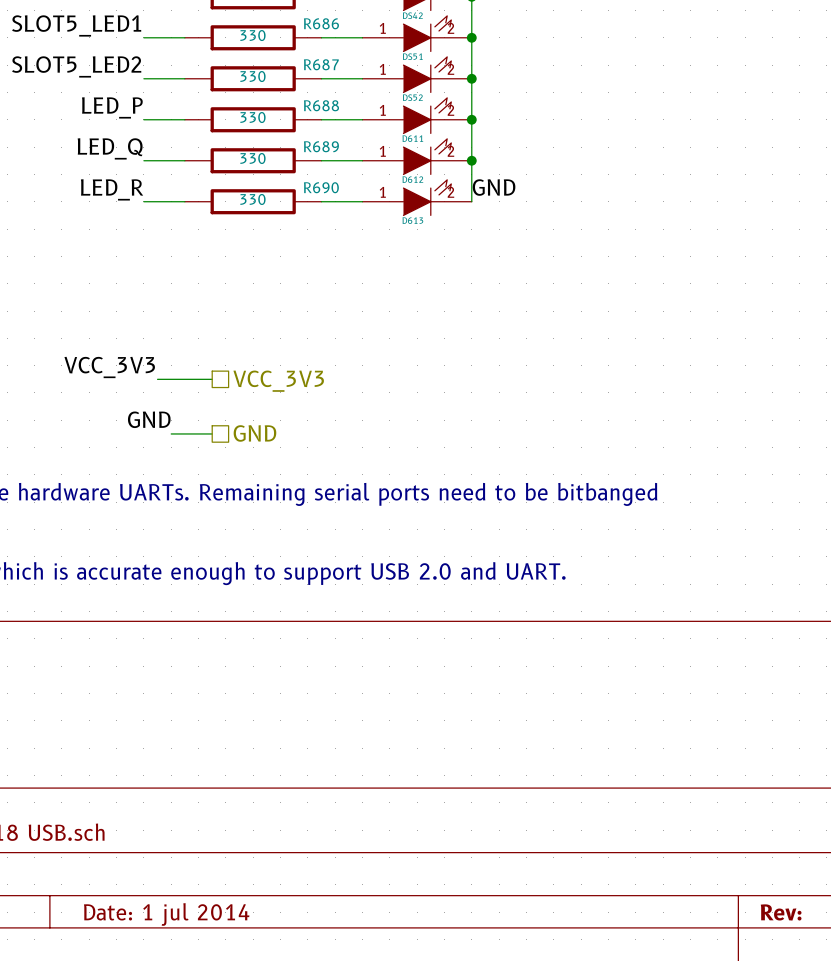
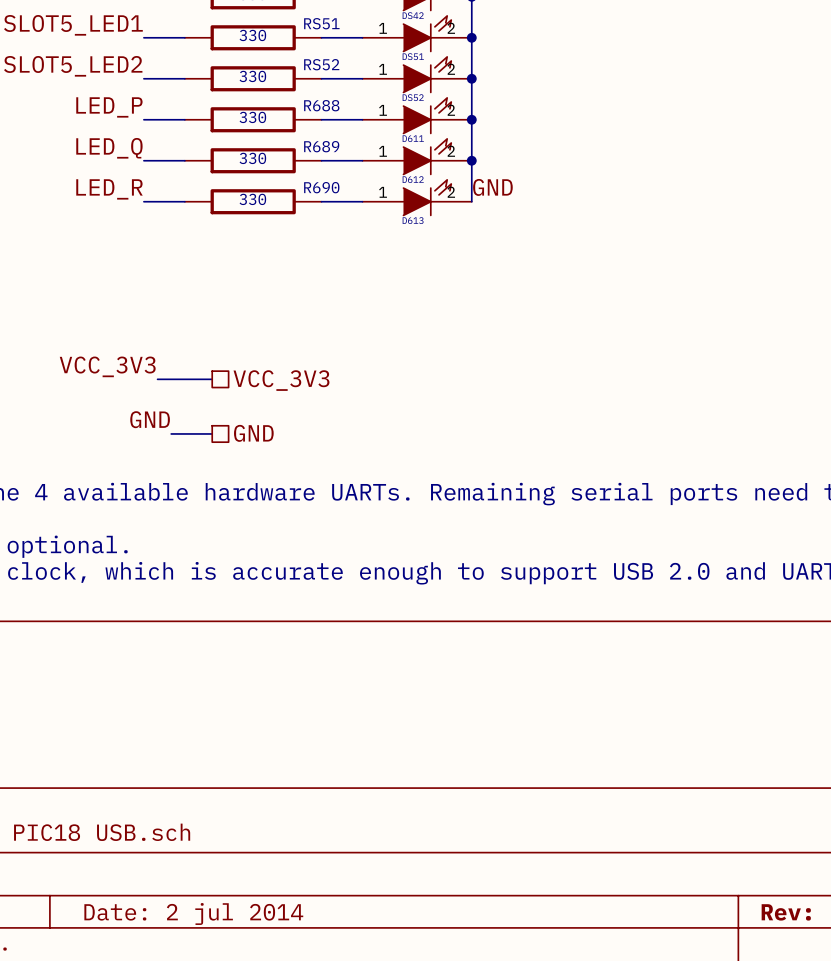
R686 name: R686 (321, 23) -> RS51 (321, 23)
R687 name: R687 (321, 64) -> RS52 (321, 64)
title block: Date: 1 jul 2014 (166, 914) -> Date: 2 jul 2014 (193, 913)

